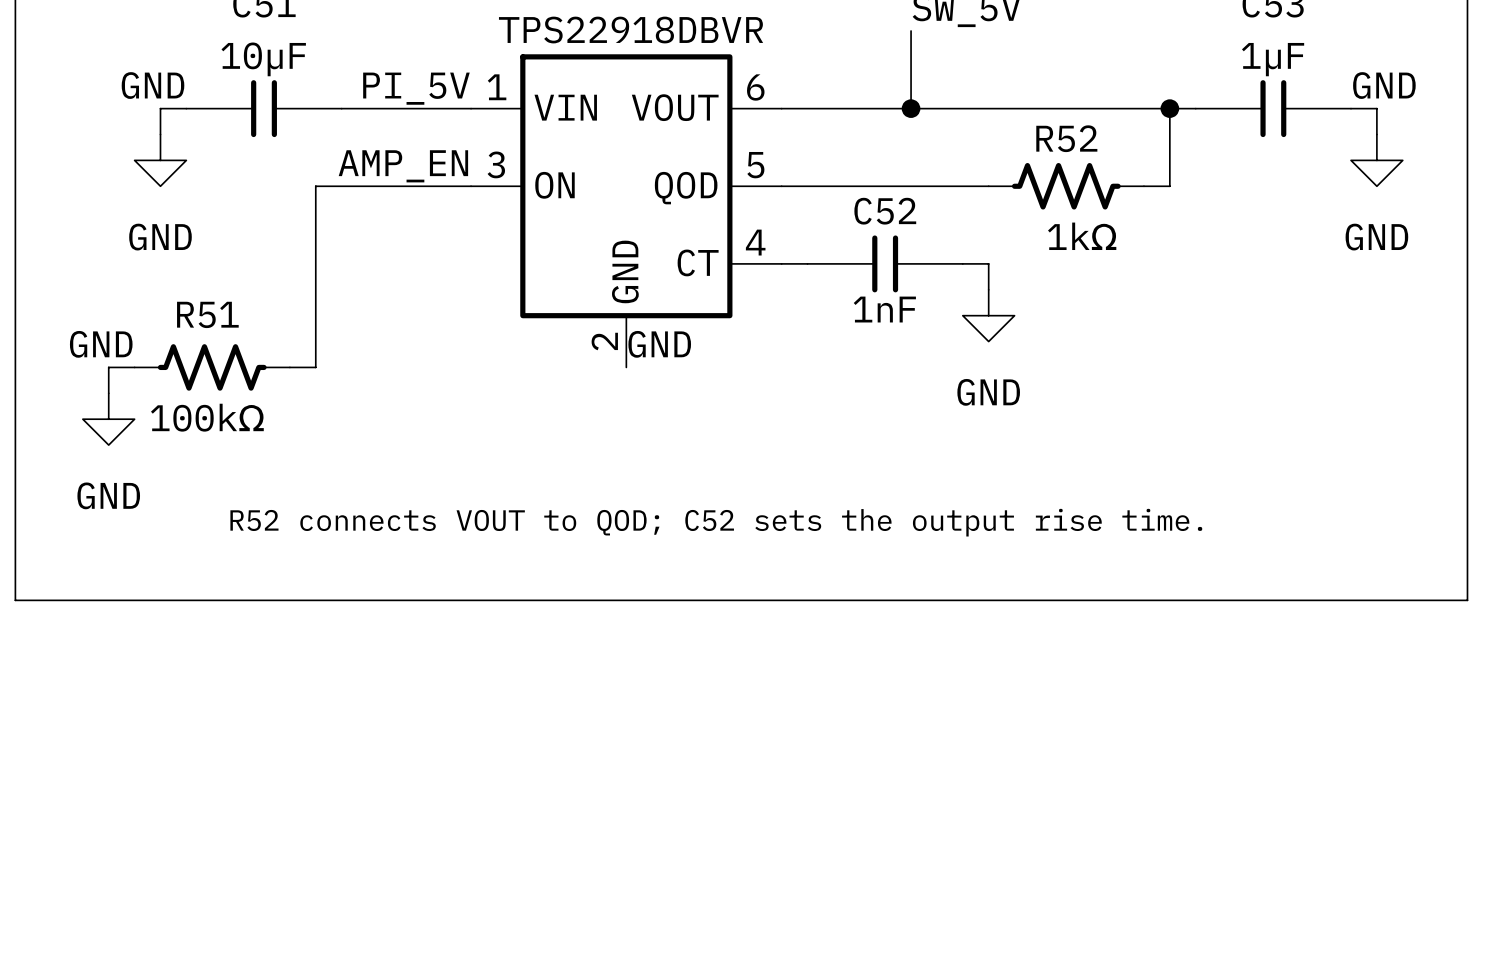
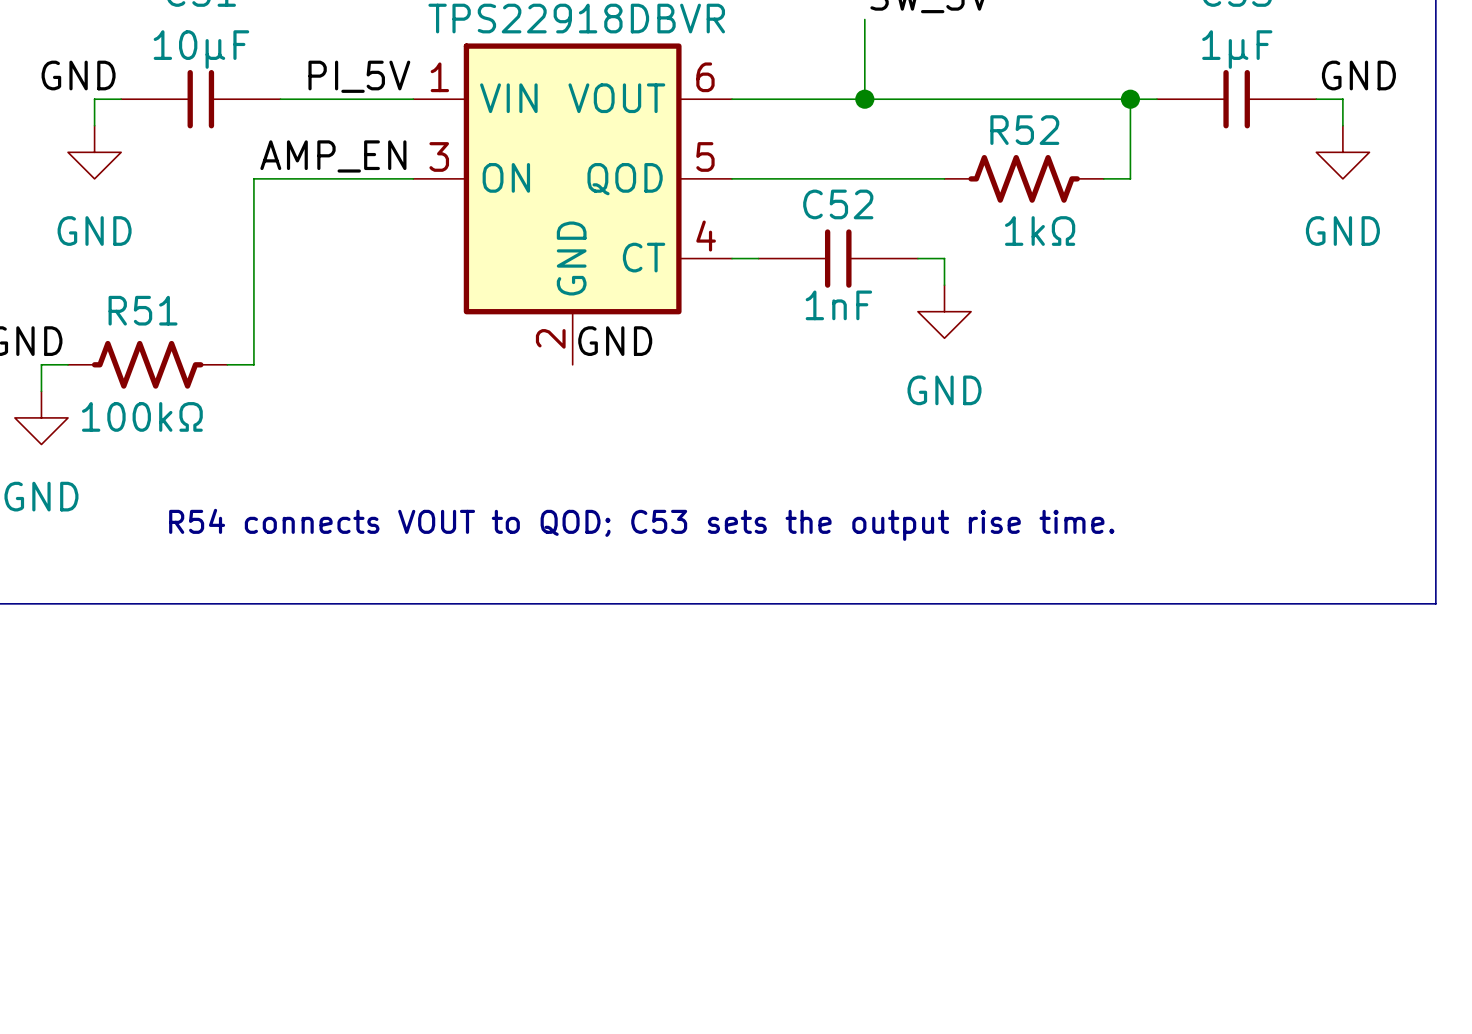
text: R52 connects VOUT to QOD; C52 sets the output rise time. (716, 522) -> R54 connects VOUT to QOD; C53 sets the output rise time. (641, 524)

